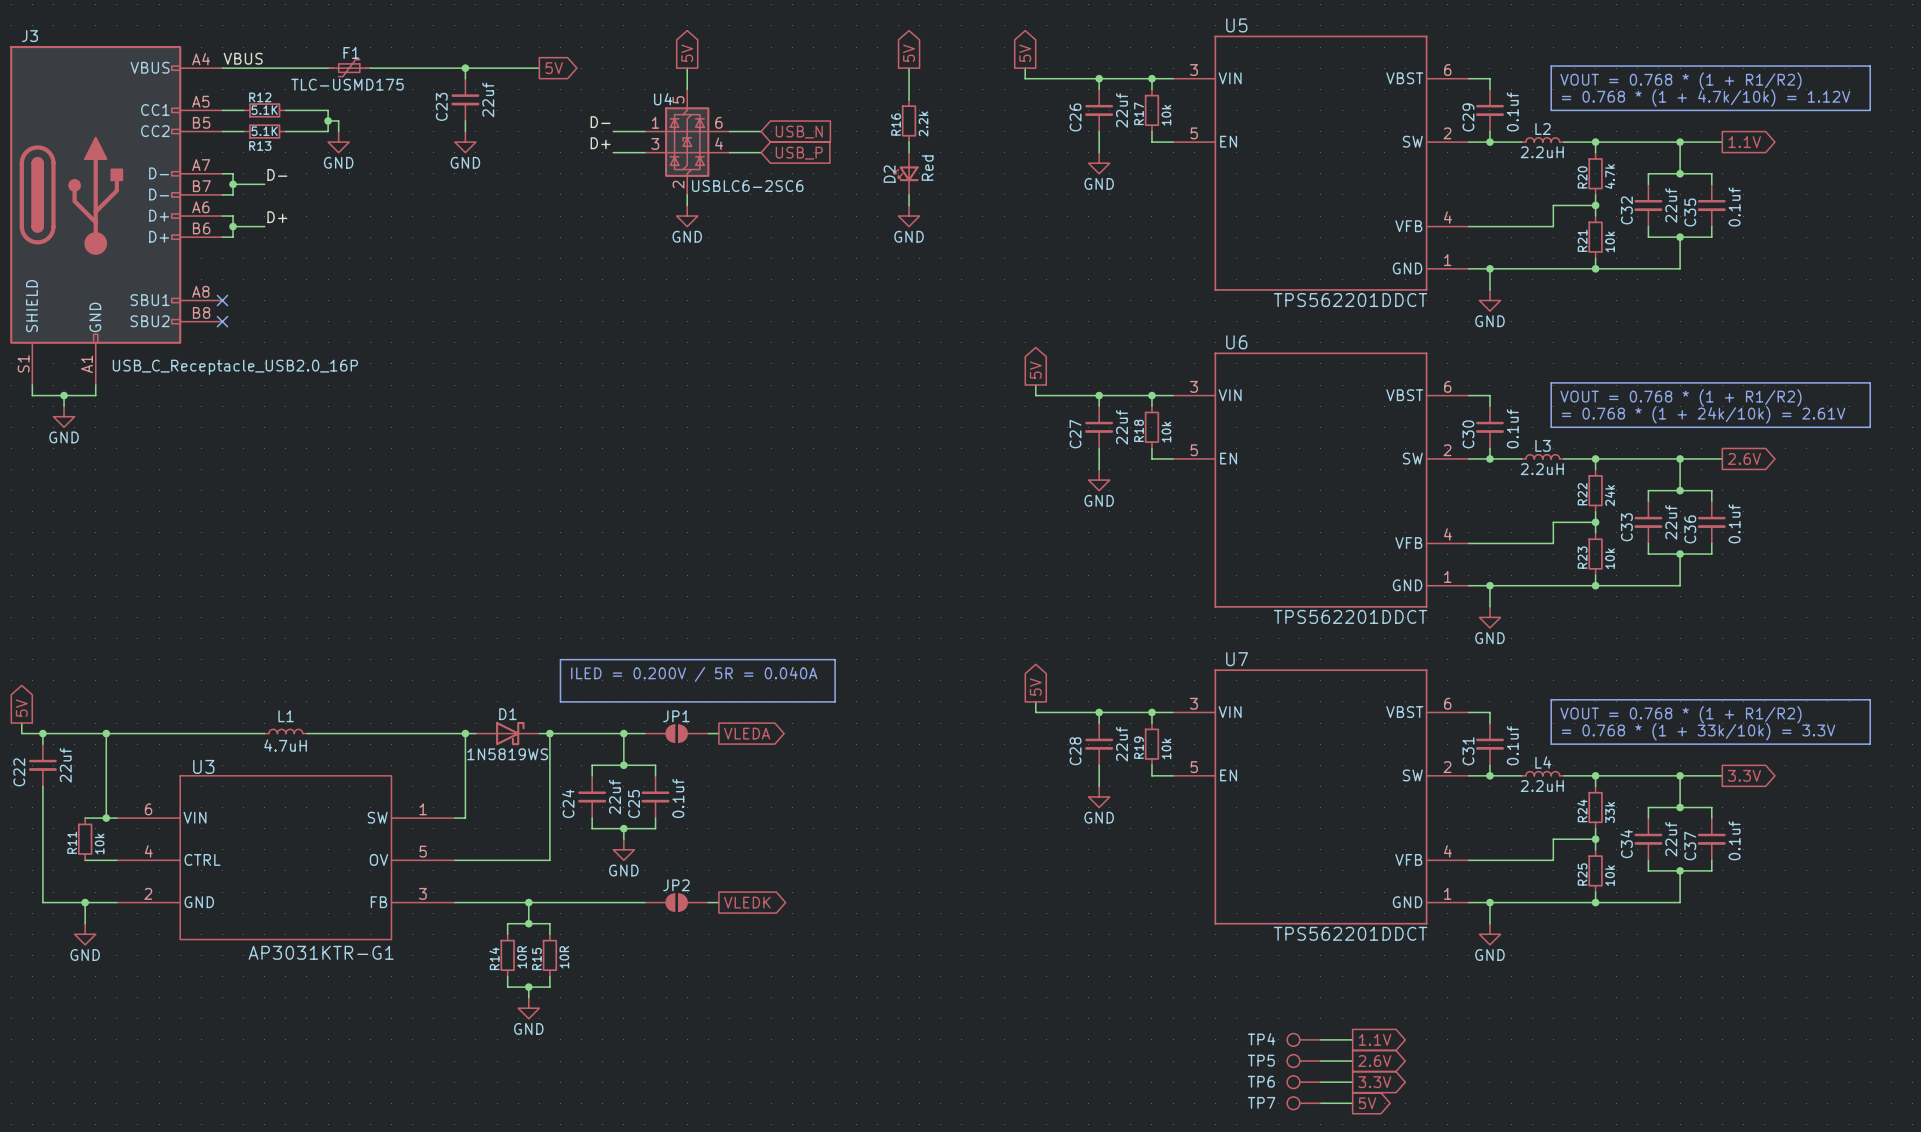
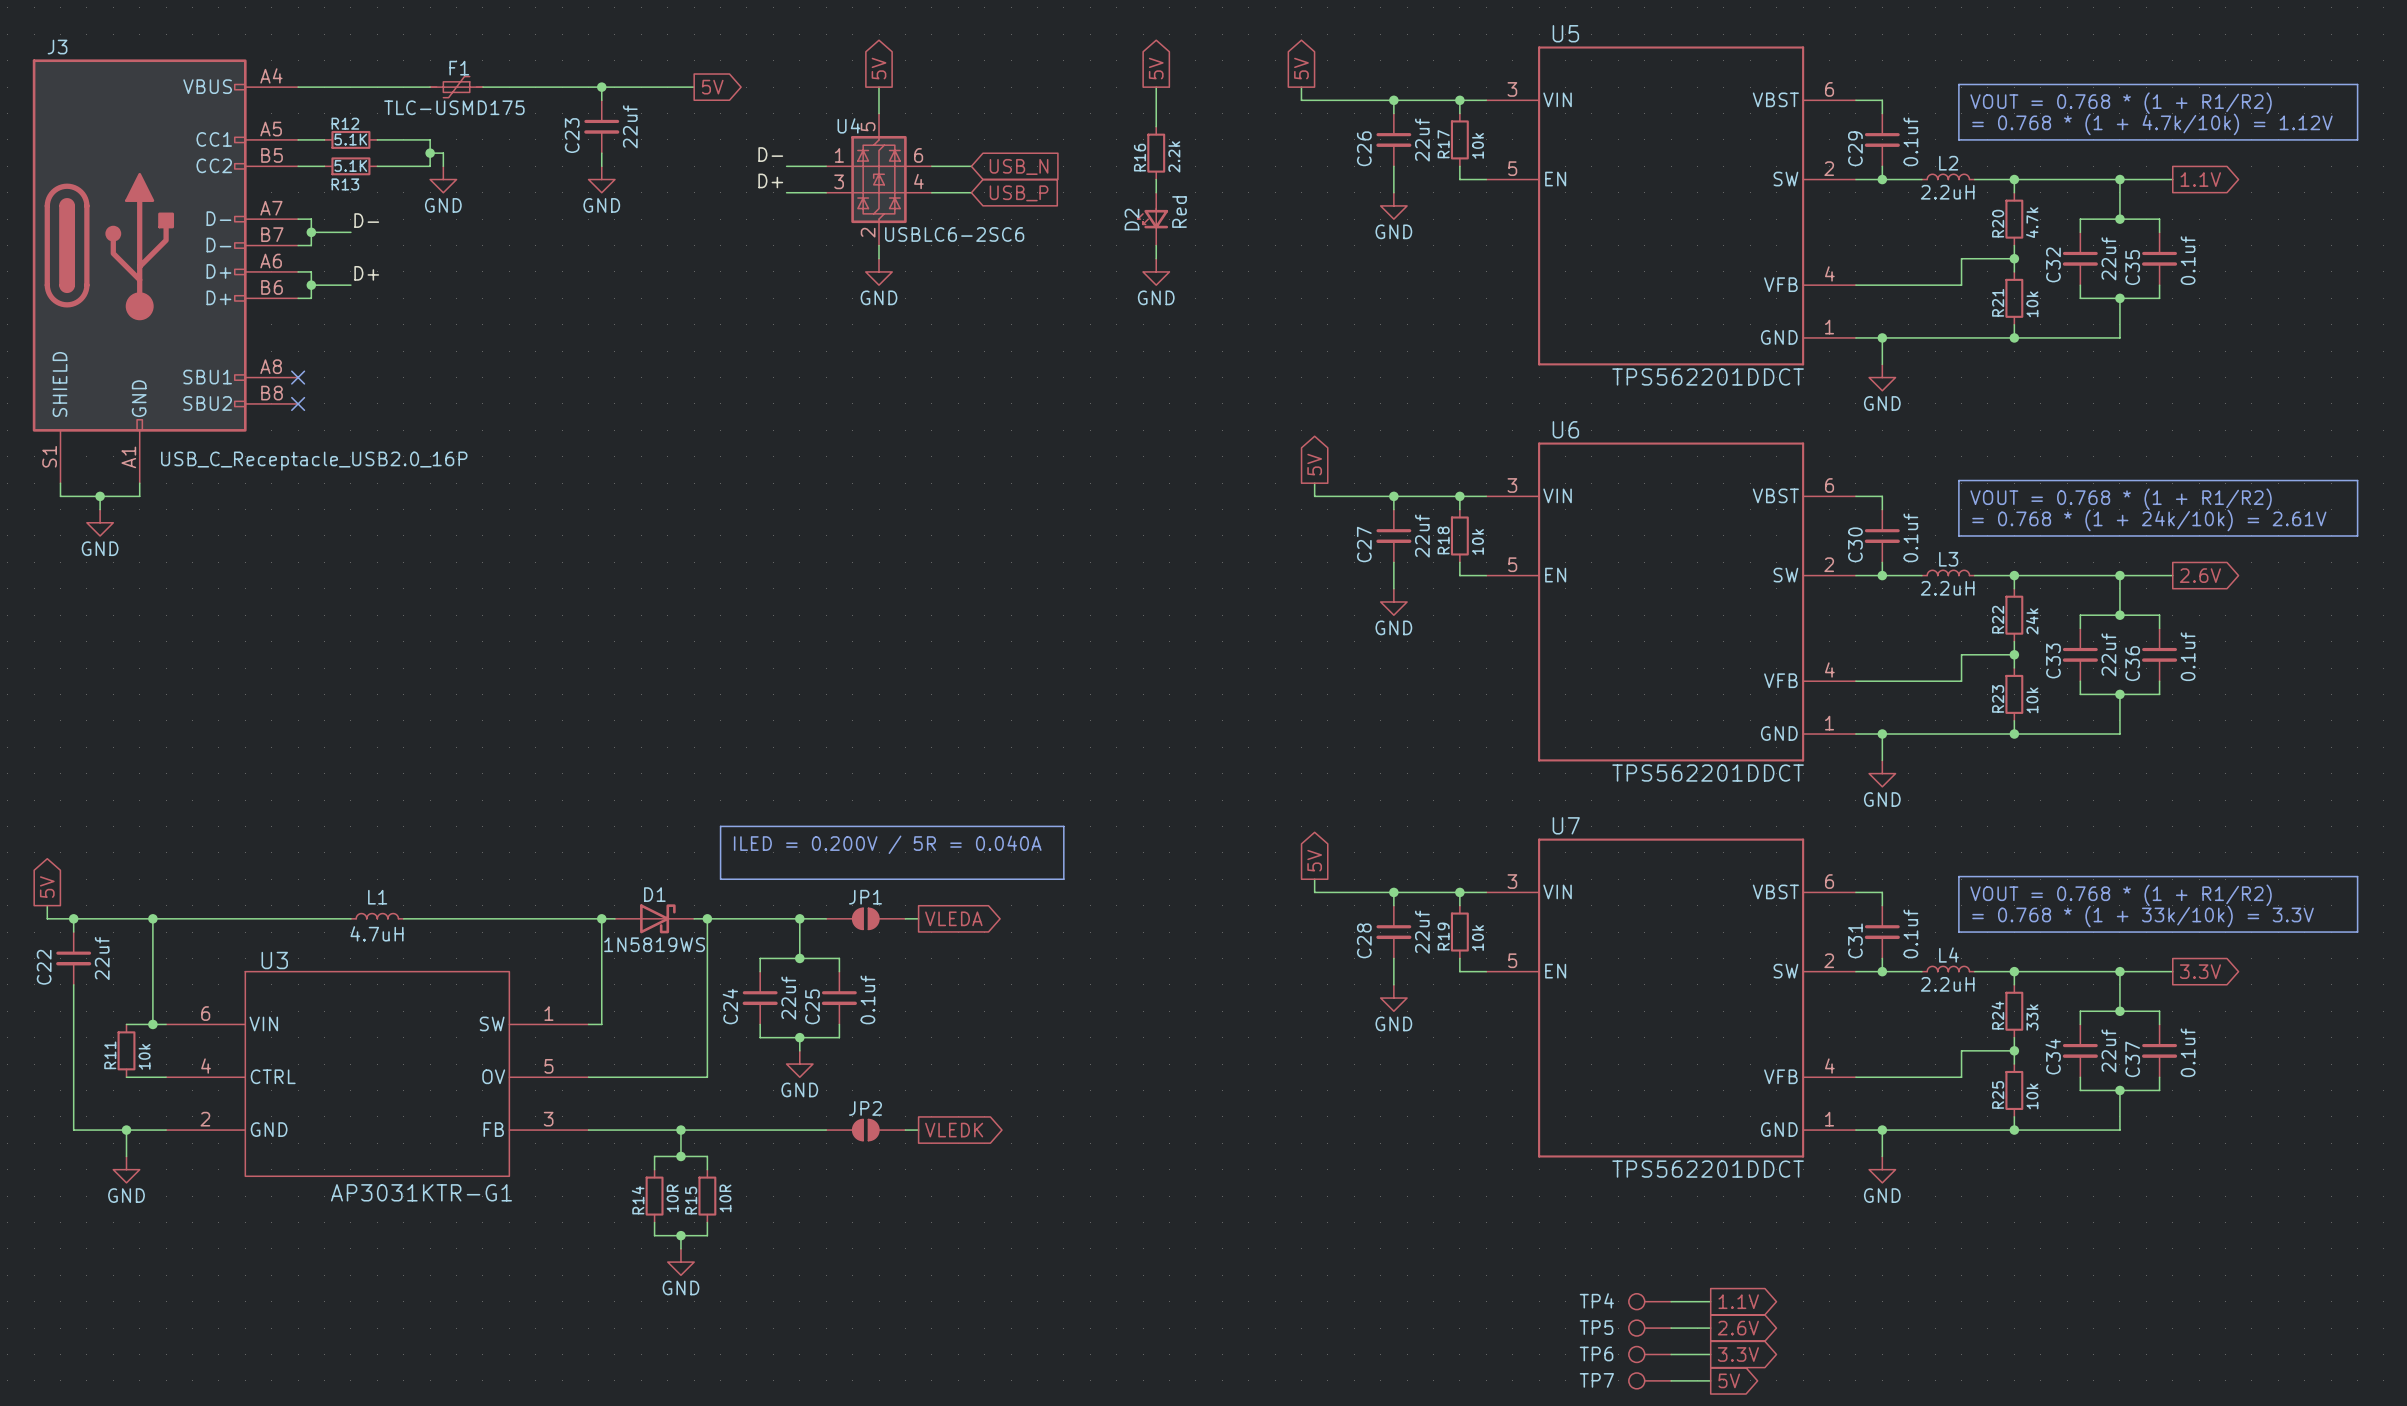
label: VBUS (243, 58) -> none

